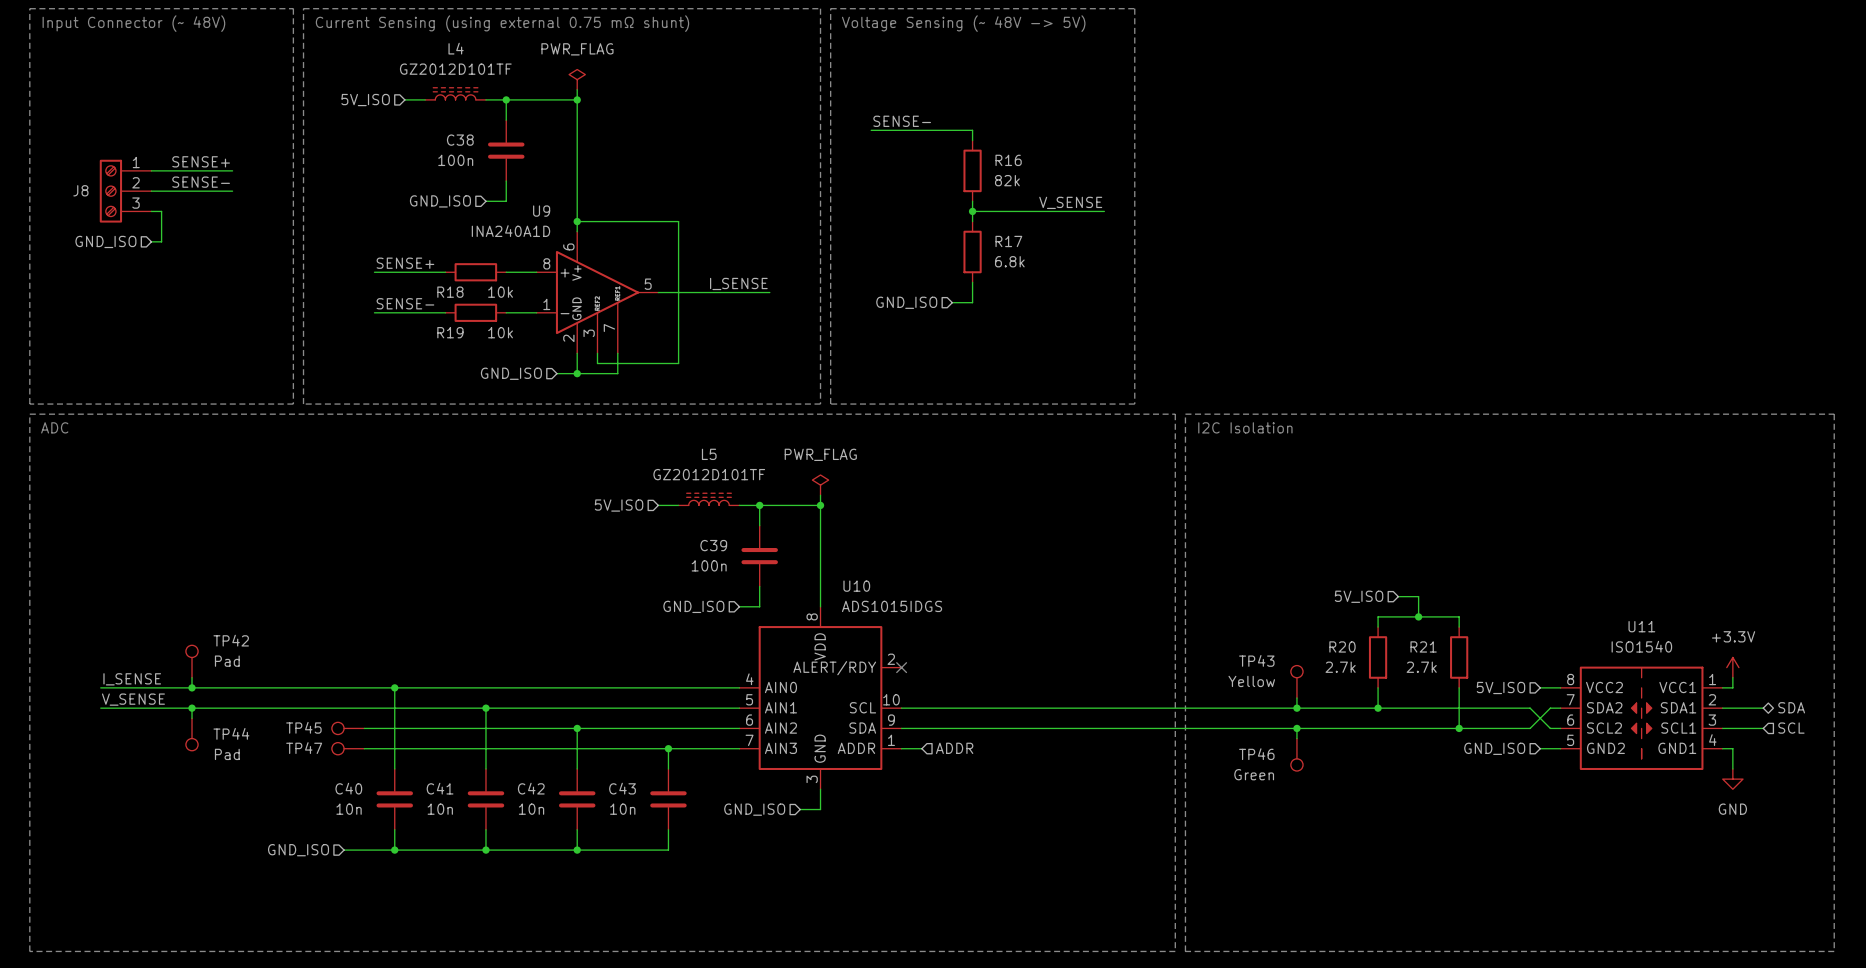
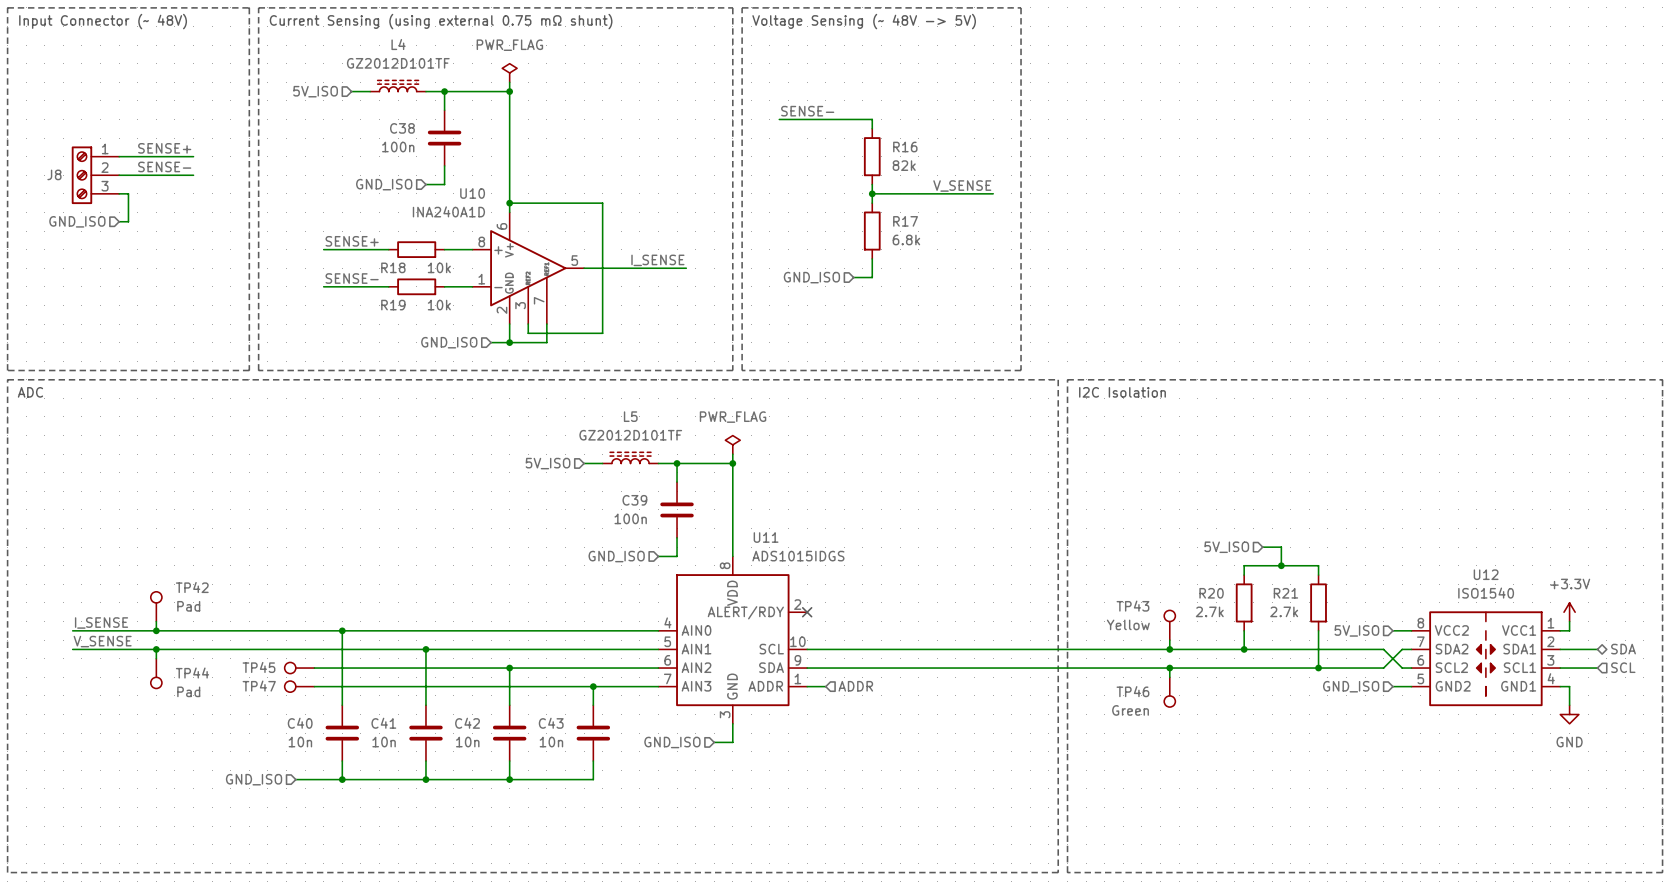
U9 name: U9 (541, 211) -> U10 (472, 193)
U10 name: U10 (856, 586) -> U11 (766, 537)
U11 name: U11 (1641, 626) -> U12 (1486, 574)

